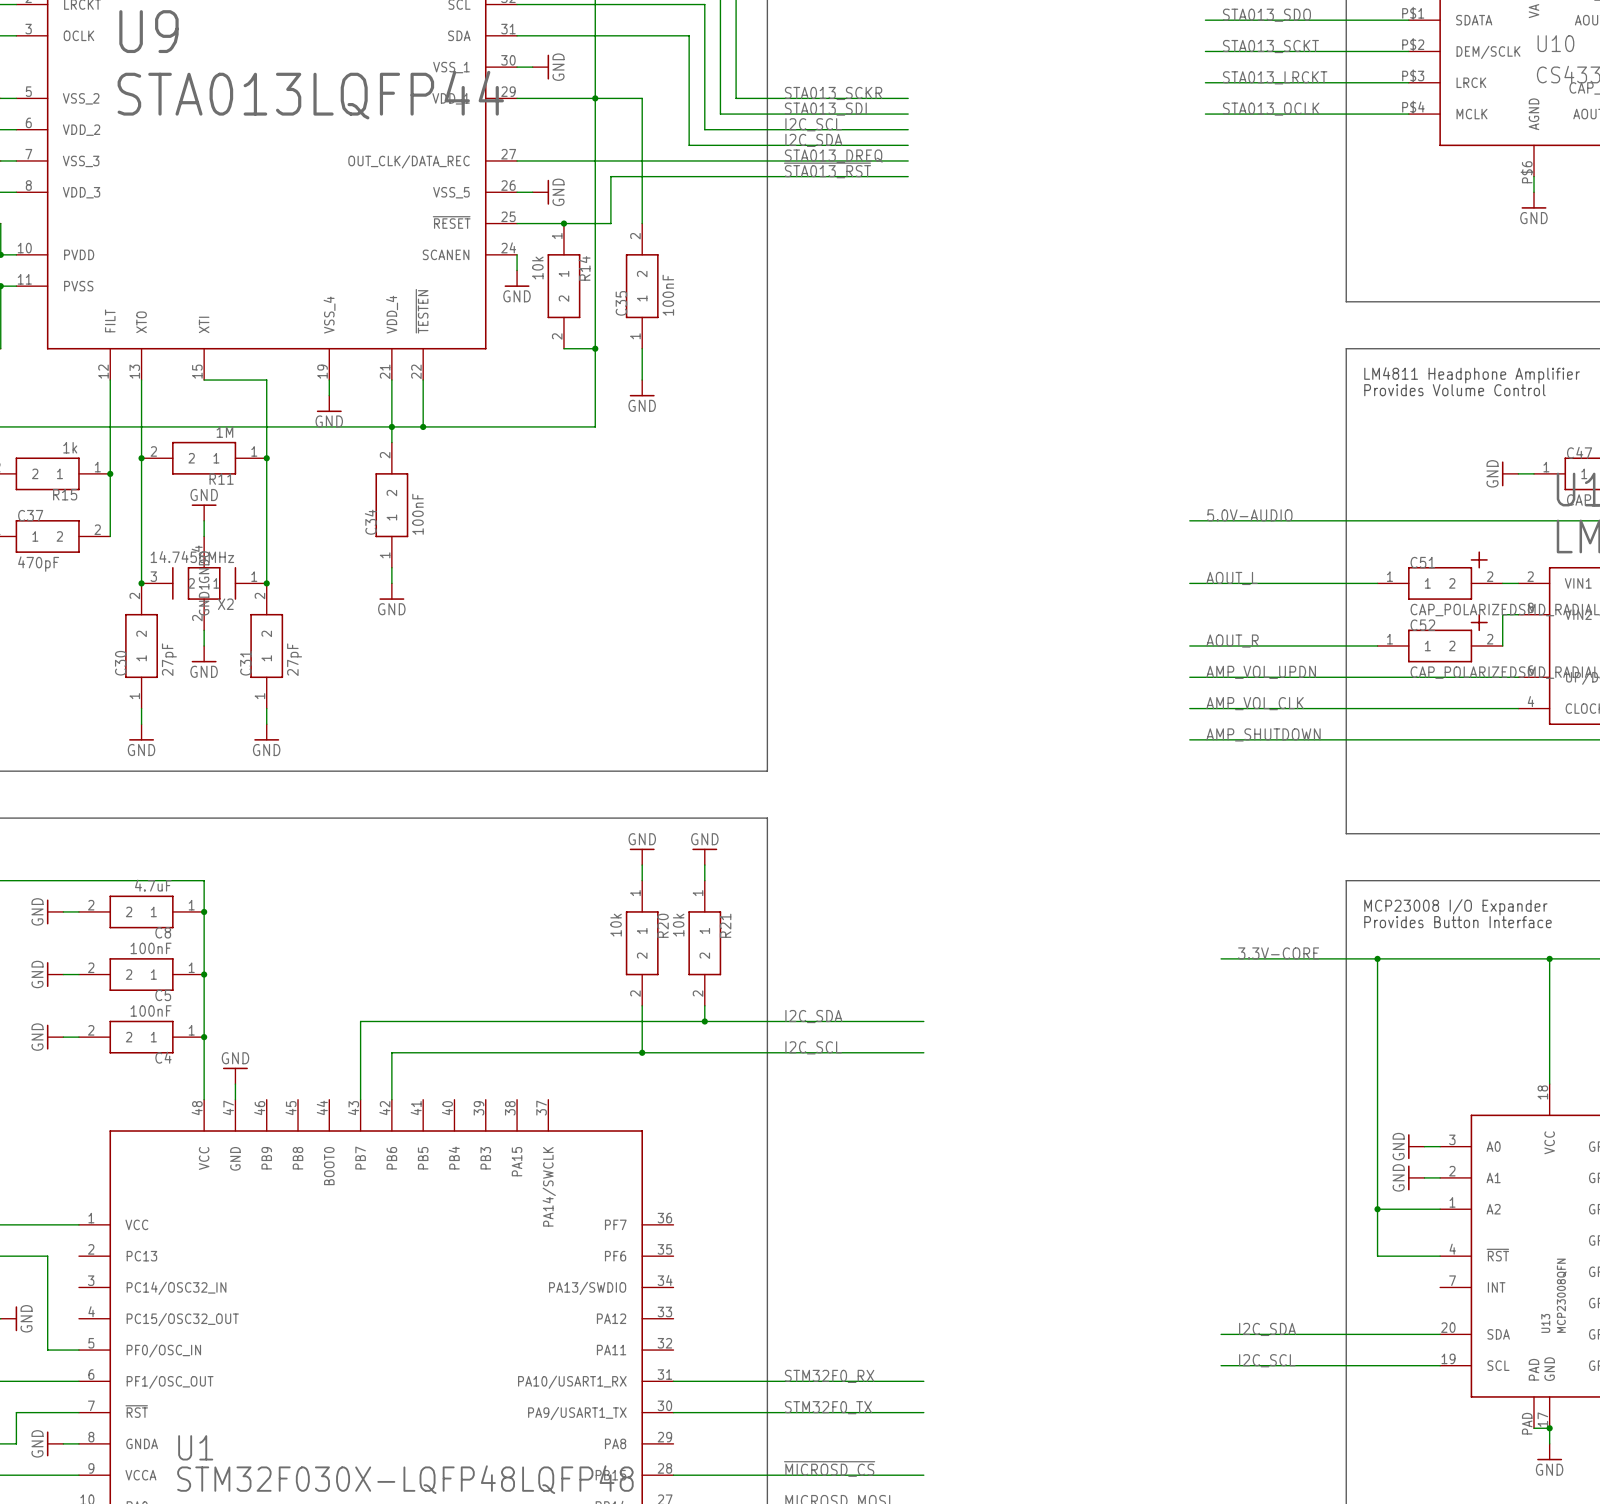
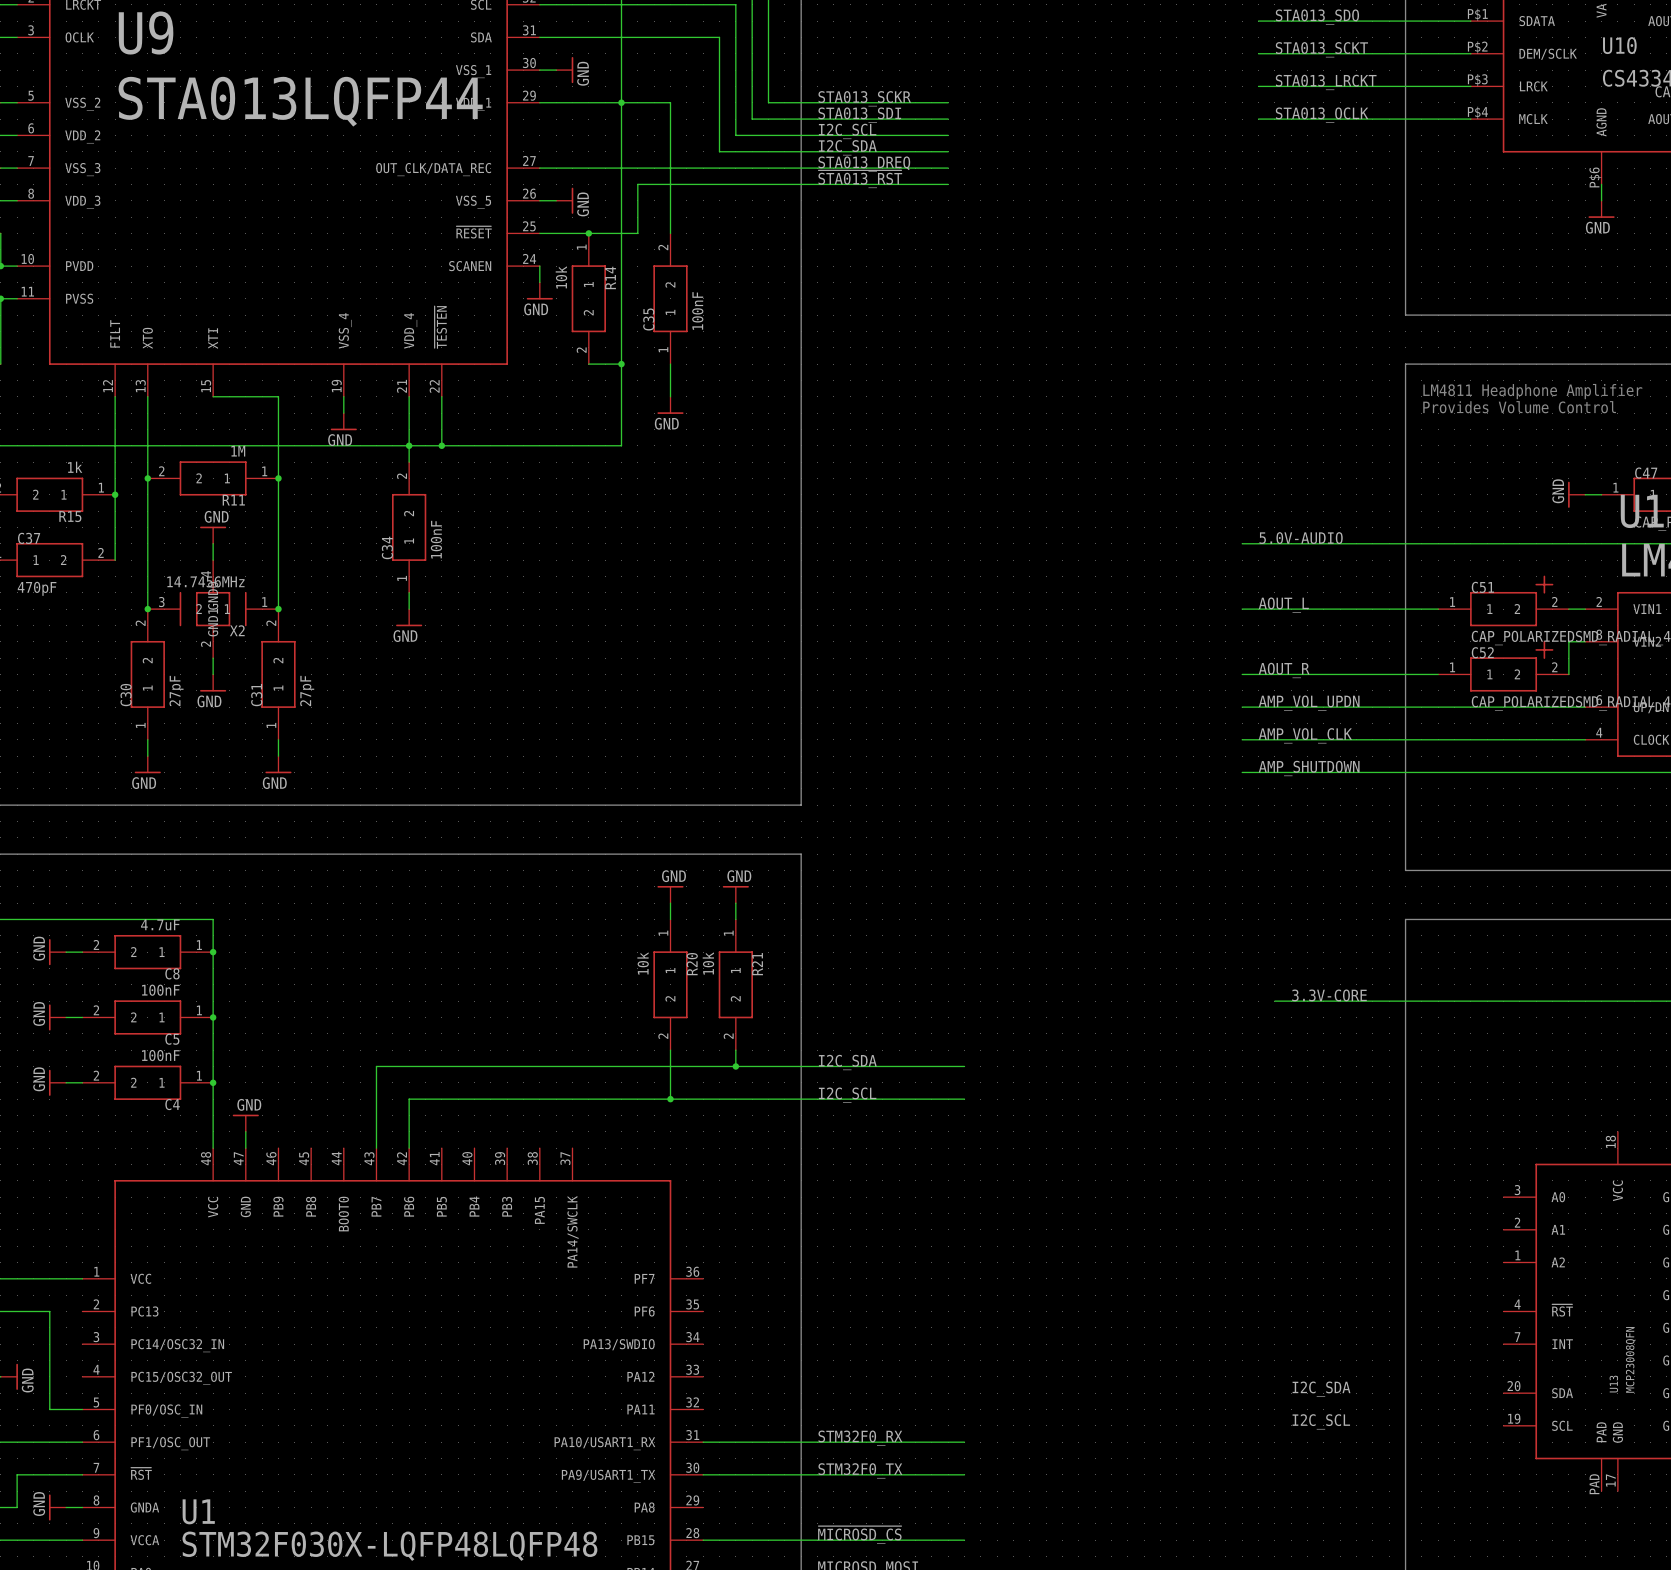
text: MCP23008 I/O Expander (1455, 907) -> none
text: Provides Button Interface (1457, 922) -> none
wire: (1377, 958) (1377, 1256) (1440, 1256) -> none
junction: (1377, 958) -> none
wire: (1549, 958) (1549, 1084) -> none
junction: (1549, 958) -> none
power symbol: GND (1416, 1146) -> none
wire: (1424, 1146) (1440, 1146) -> none
power symbol: GND (1416, 1177) -> none
wire: (1424, 1177) (1440, 1177) -> none
wire: (1377, 1209) (1440, 1209) -> none
junction: (1377, 1209) -> none
wire: (1221, 1334) (1440, 1334) -> none
wire: (1221, 1365) (1440, 1365) -> none
wire: (1534, 1428) (1549, 1428) (1549, 1443) -> none
junction: (1549, 1428) -> none
power symbol: GND (1549, 1452) -> none

